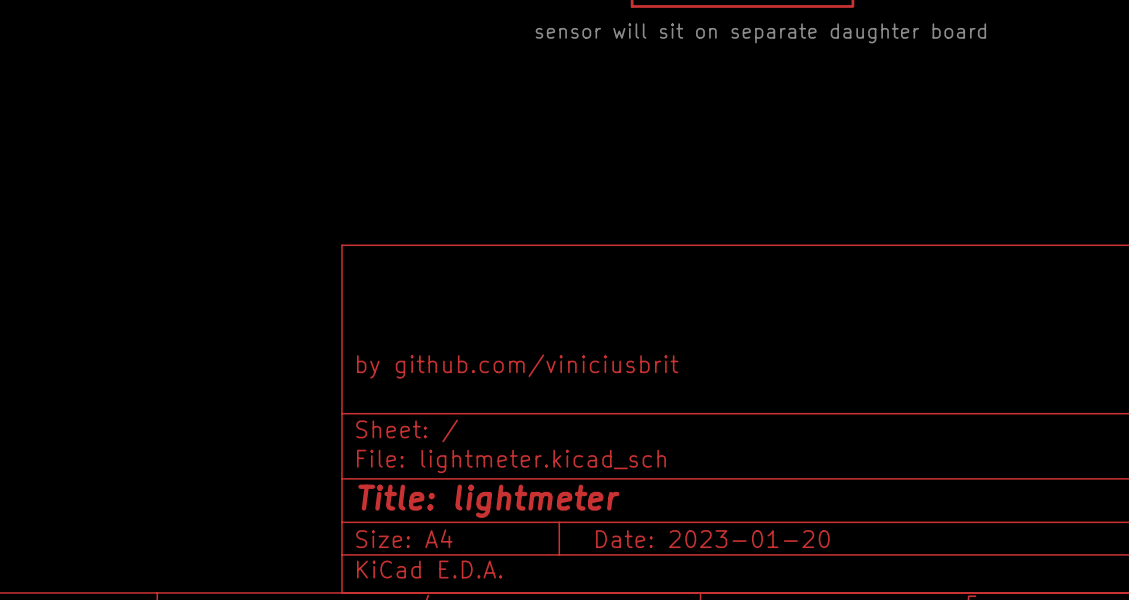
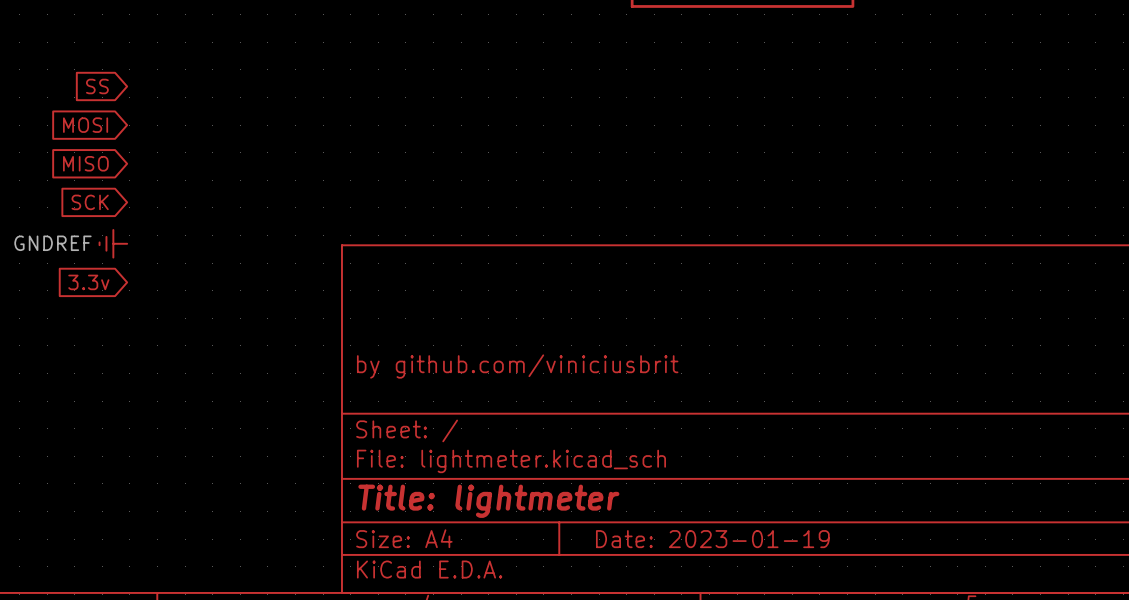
text: sensor will sit on separate daughter board (760, 33) -> none
global label: none -> SS (97, 86)
global label: none -> MOSI (85, 125)
global label: none -> MISO (85, 163)
global label: none -> SCK (90, 202)
power symbol: none -> GNDREF (113, 243)
global label: none -> 3.3v (88, 282)
title block: Date: 2023-01-20 (712, 539) -> Date: 2023-01-19 (712, 539)

